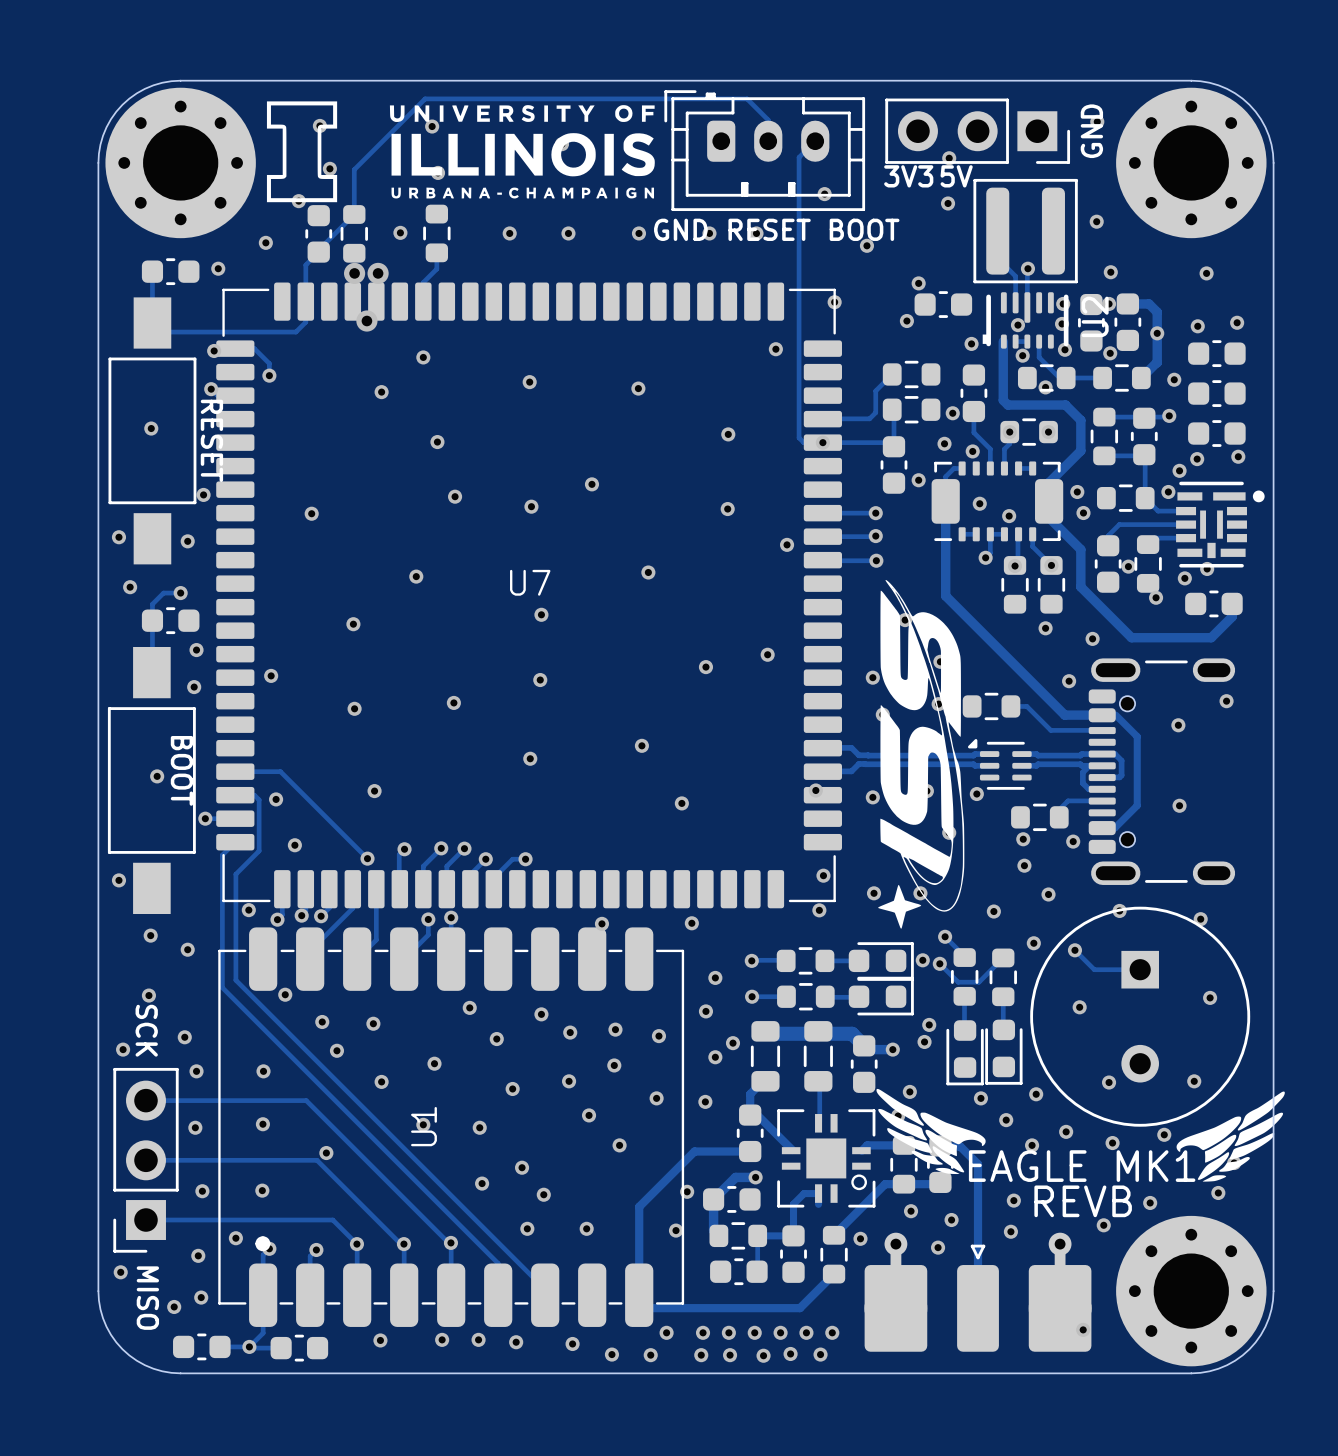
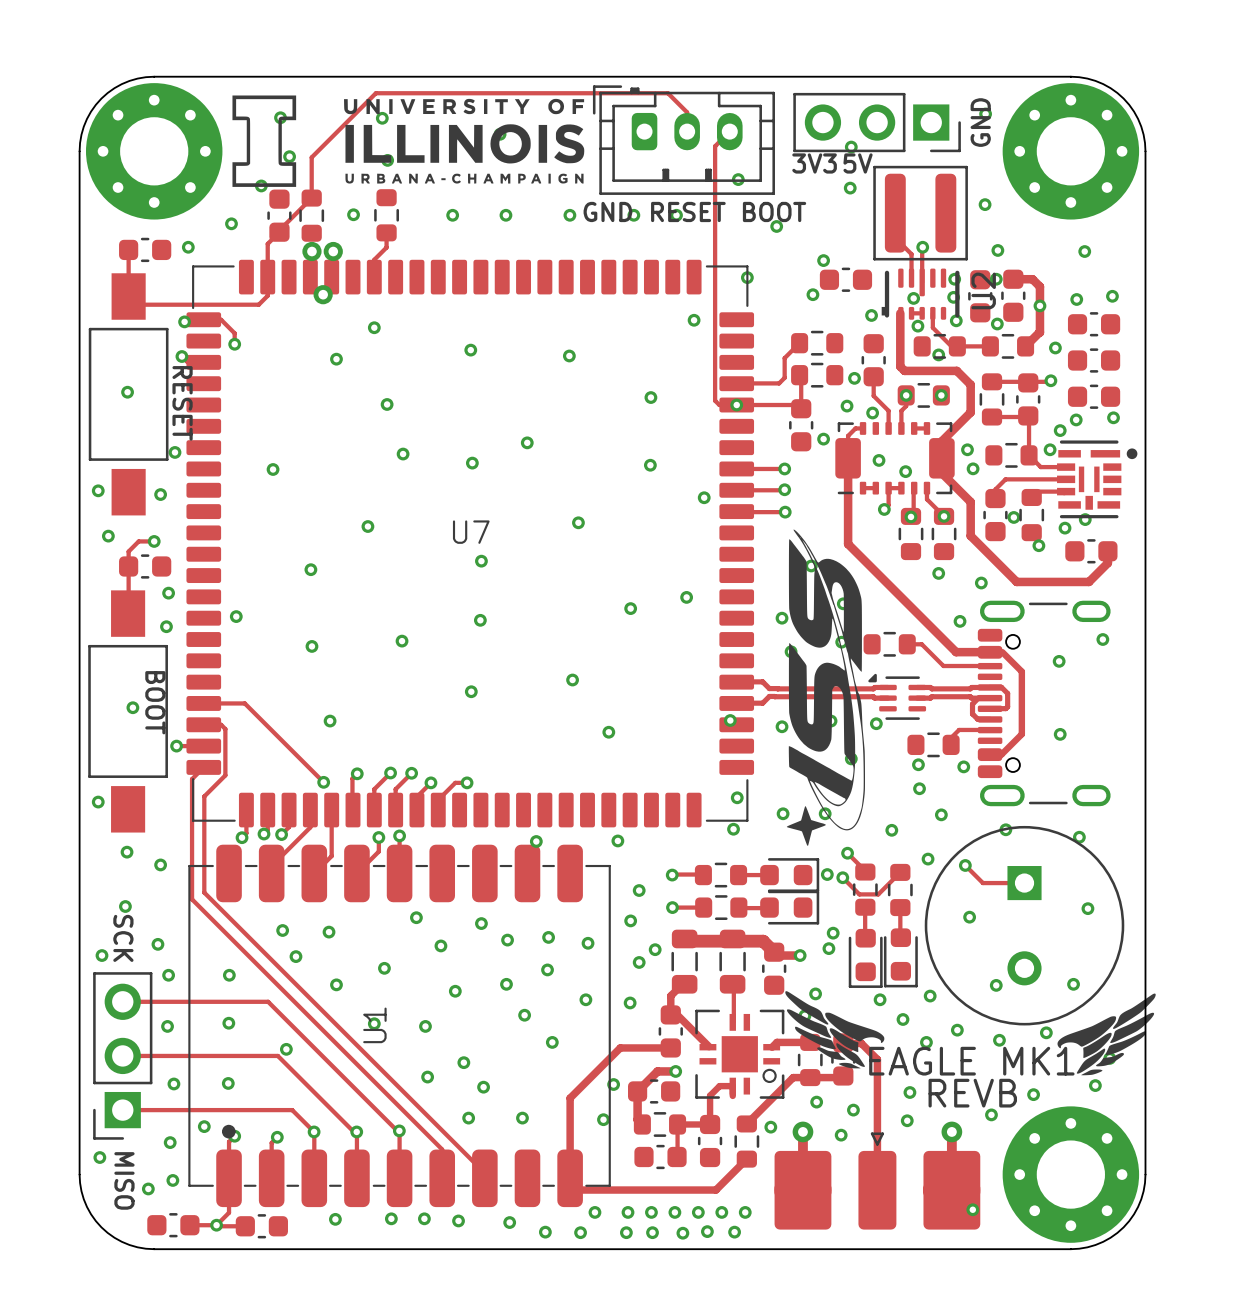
via: (276, 799) -> none
via: (294, 845) -> none
via: (248, 910) -> none
via: (285, 994) -> none

